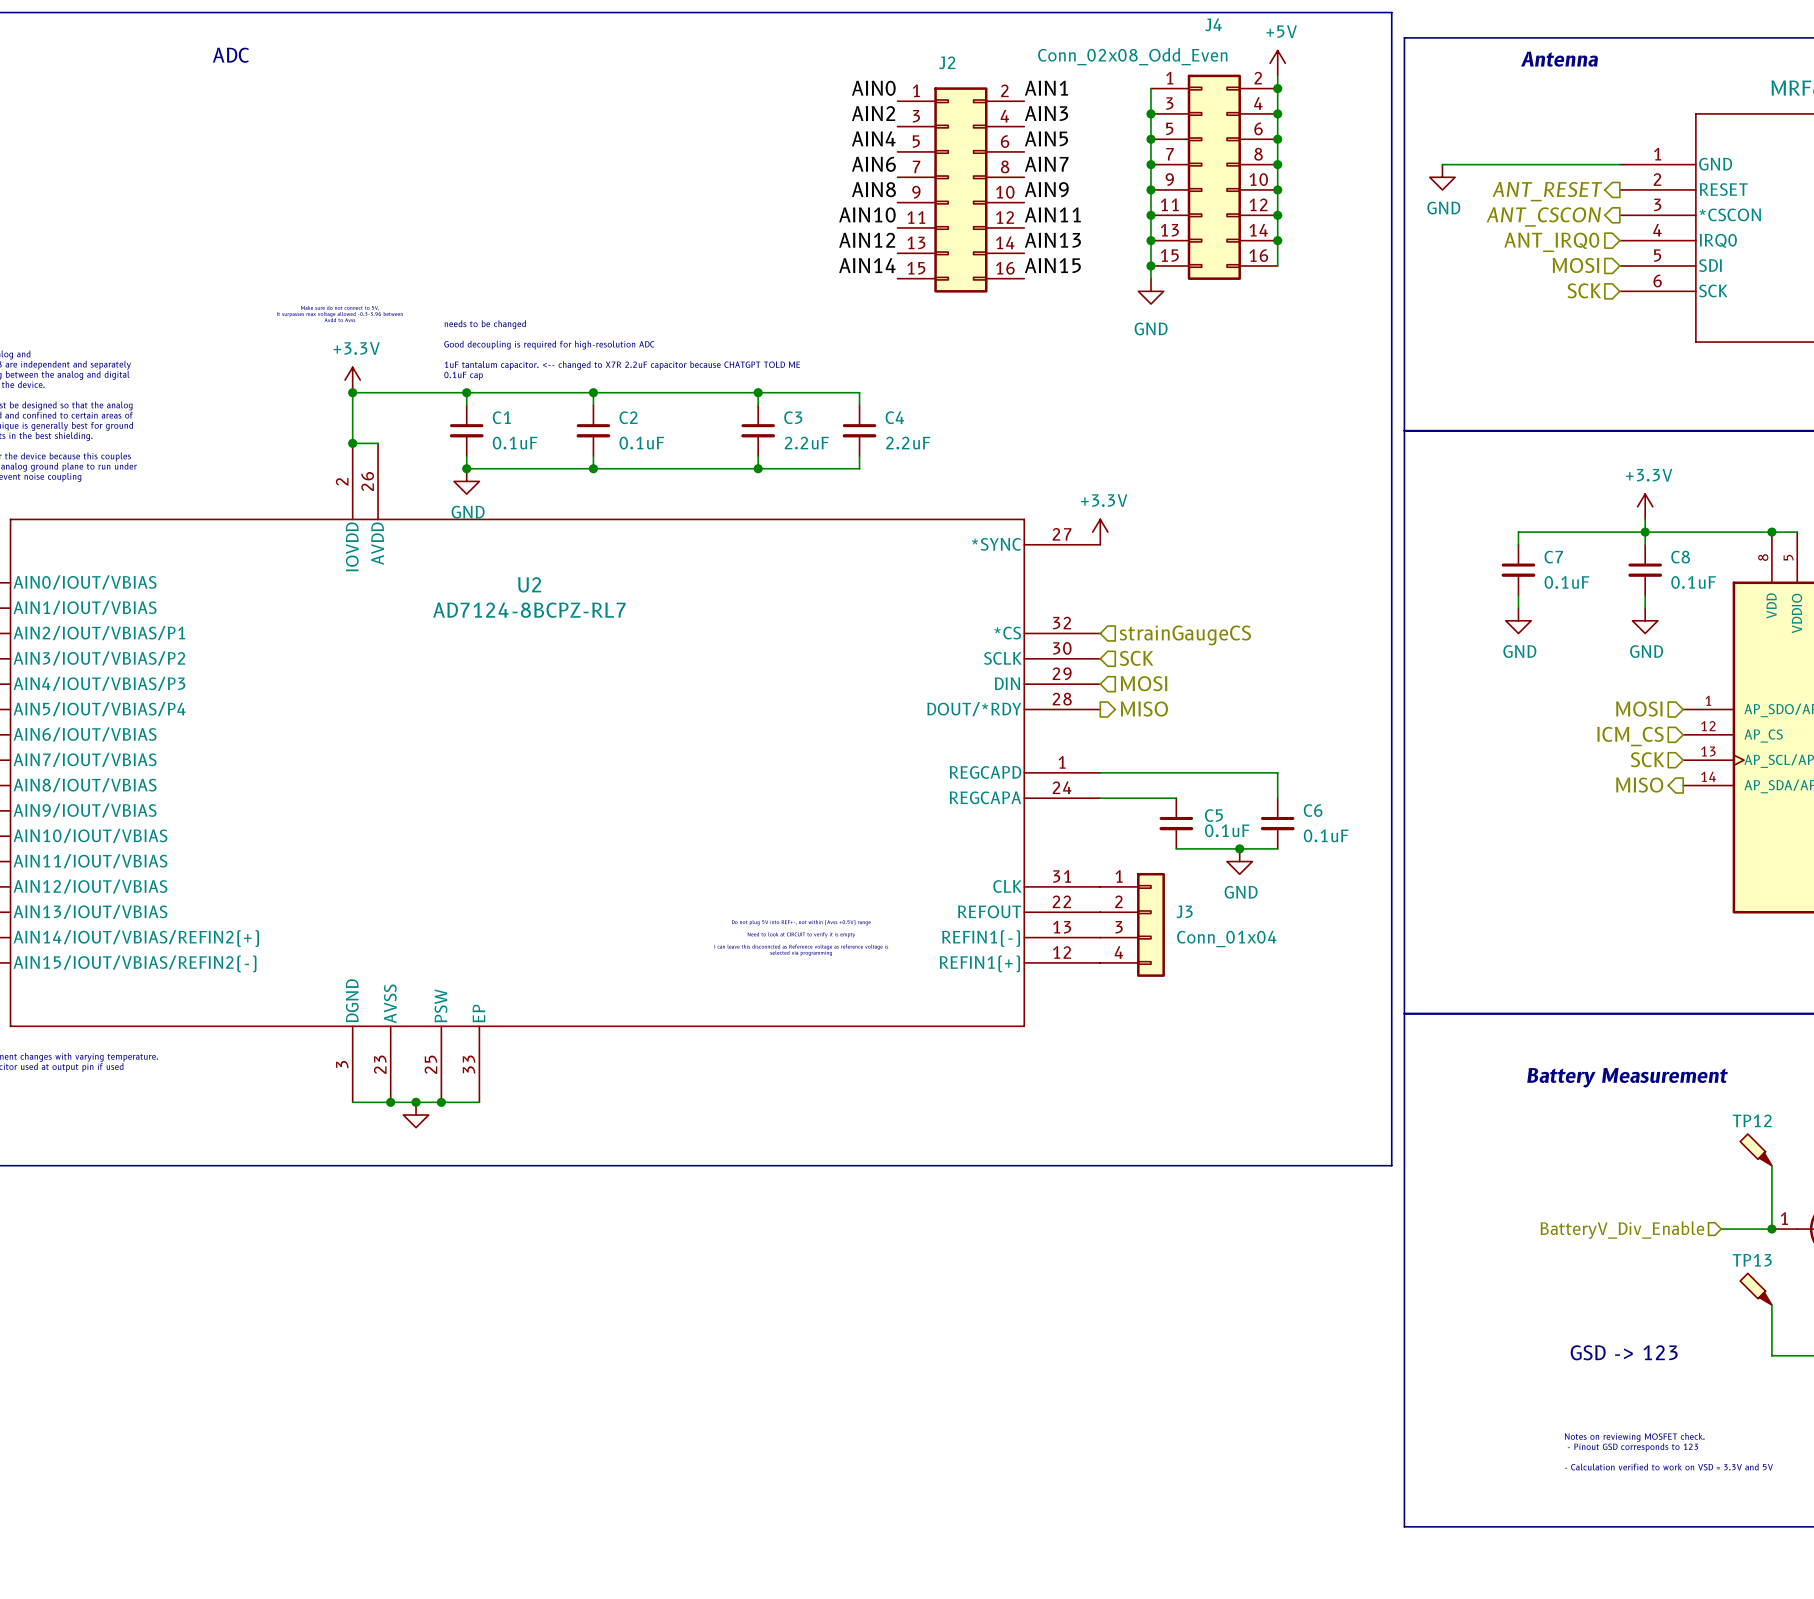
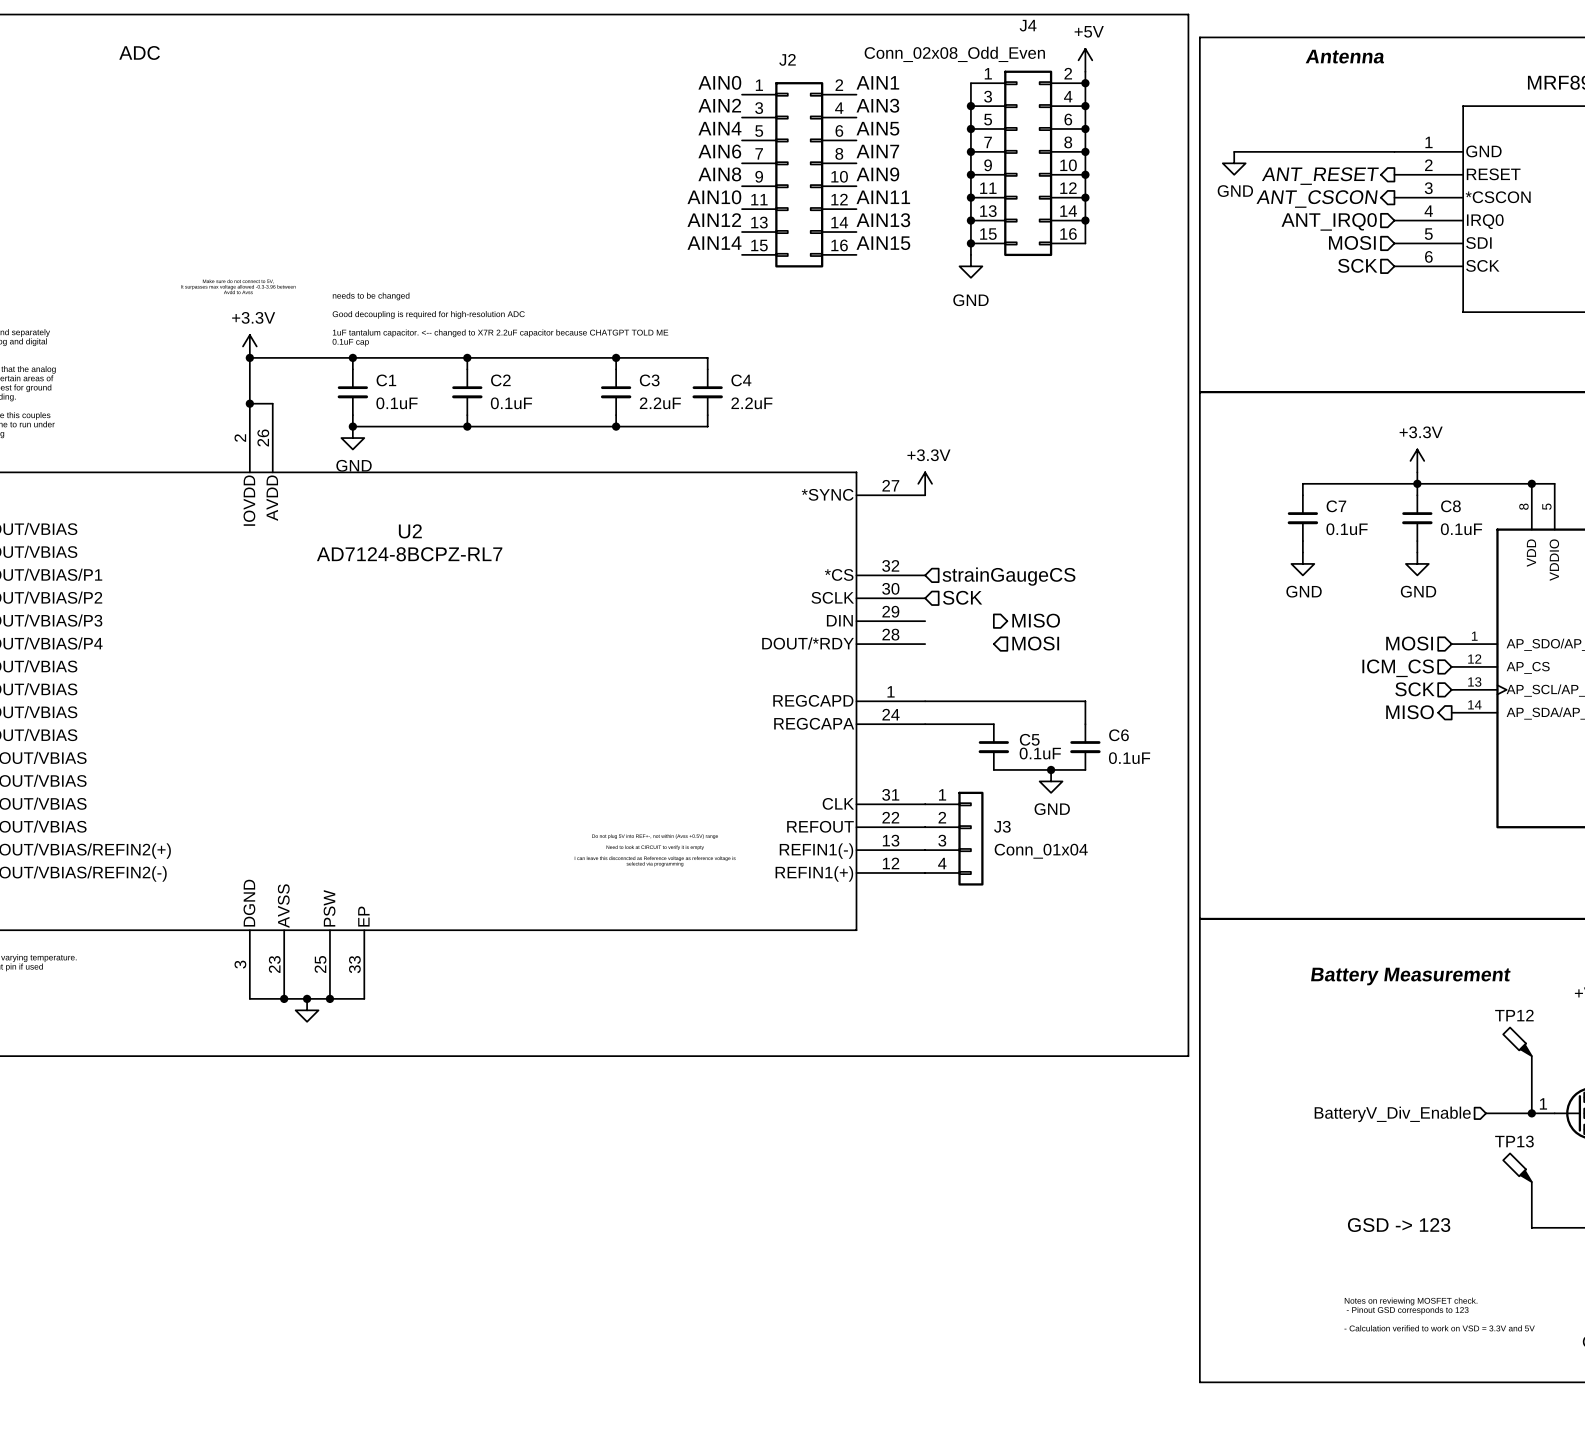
hierarchical label position: MOSI (1143, 683) -> MOSI (1035, 643)
hierarchical label position: MISO (1144, 709) -> MISO (1036, 620)

